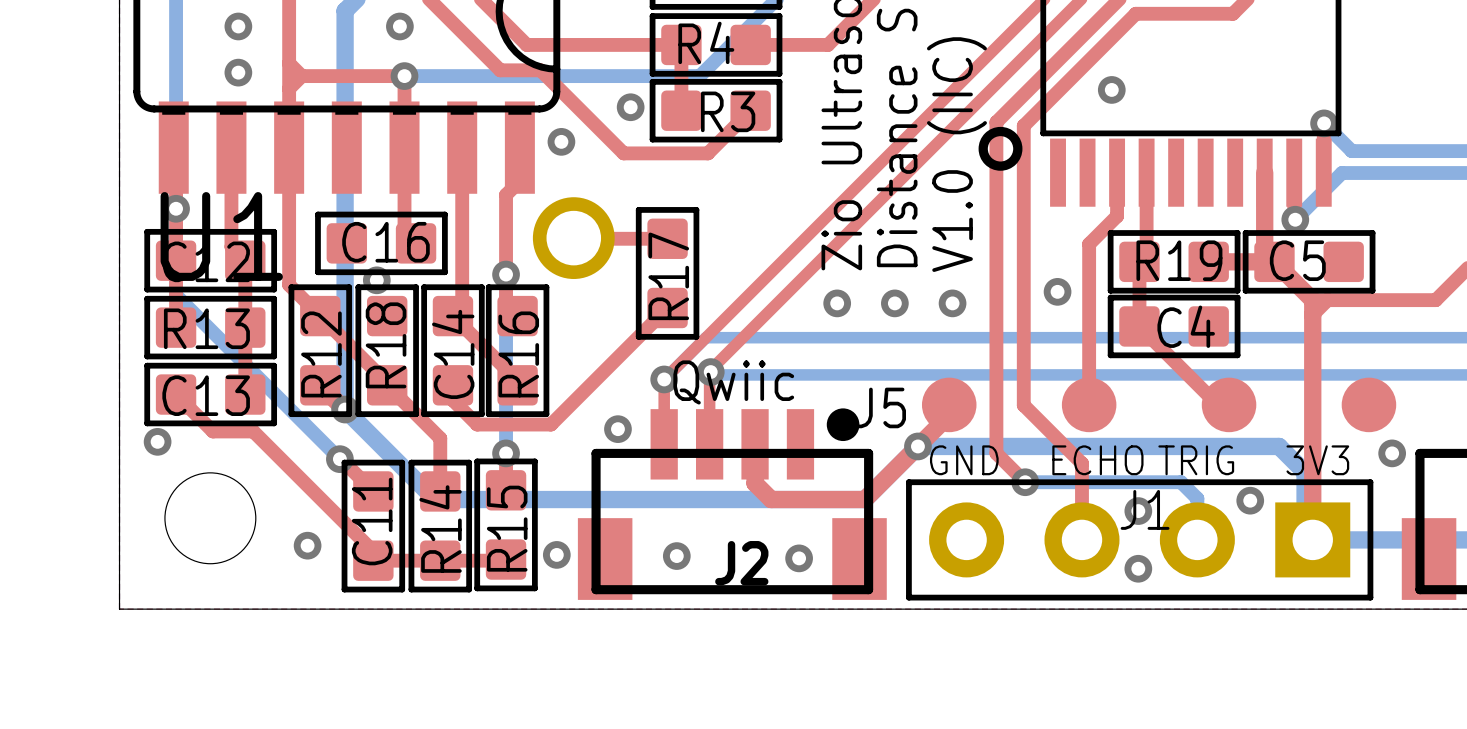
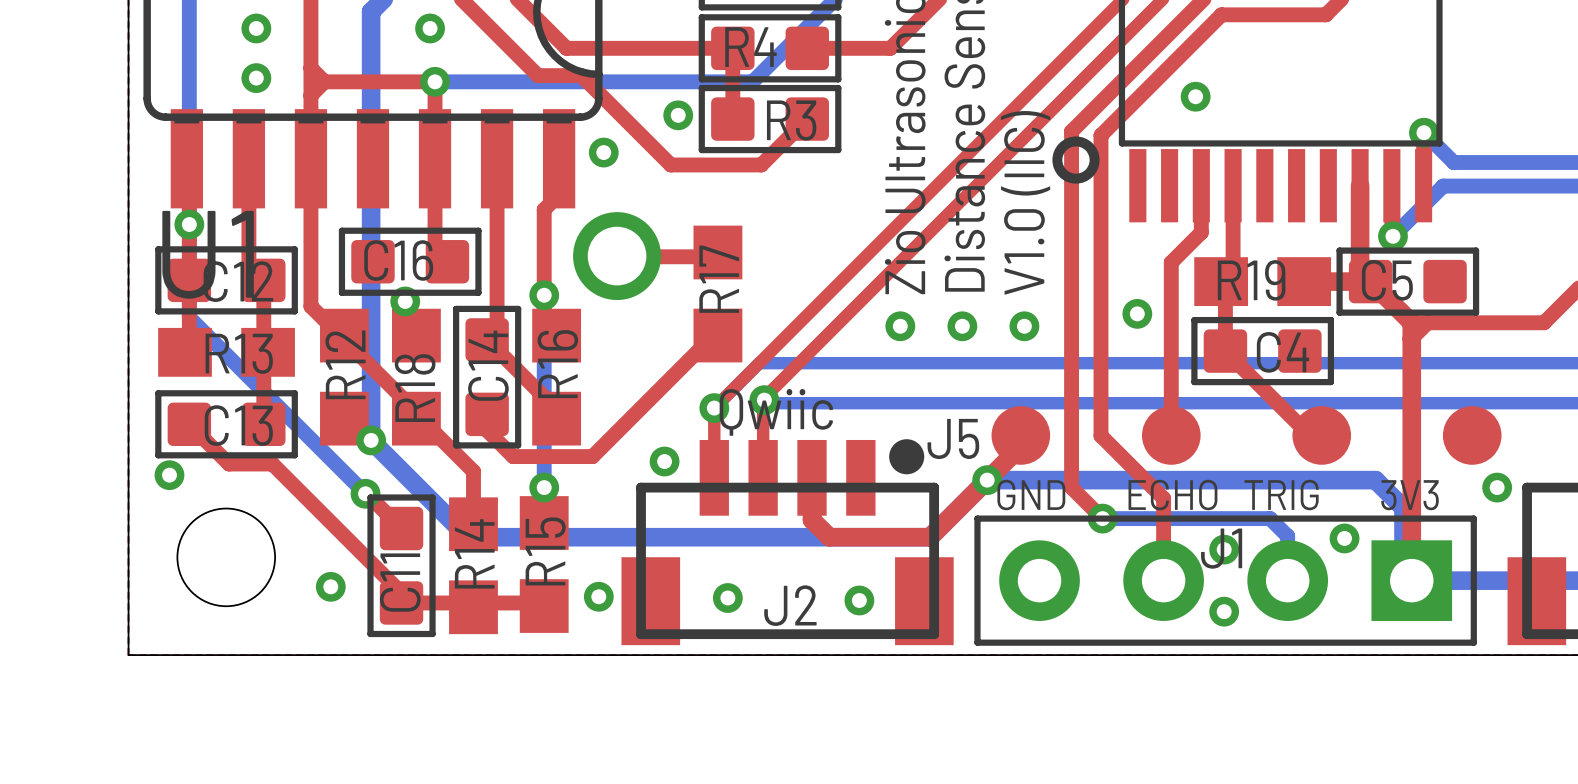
R17 footprint: [635, 207, 700, 340] -> [693, 225, 743, 363]
R19 footprint: [1107, 230, 1241, 294] -> [1194, 257, 1332, 307]
R12 footprint: [288, 284, 353, 418] -> [320, 308, 369, 446]
R18 footprint: [355, 284, 419, 418] -> [391, 308, 441, 446]
R16 footprint: [485, 284, 550, 418] -> [532, 308, 582, 446]
R13 footprint: [144, 295, 278, 360] -> [158, 327, 295, 377]
R15 footprint: [474, 458, 538, 592] -> [519, 496, 569, 633]
R14 footprint: [408, 459, 473, 593] -> [449, 497, 498, 635]

